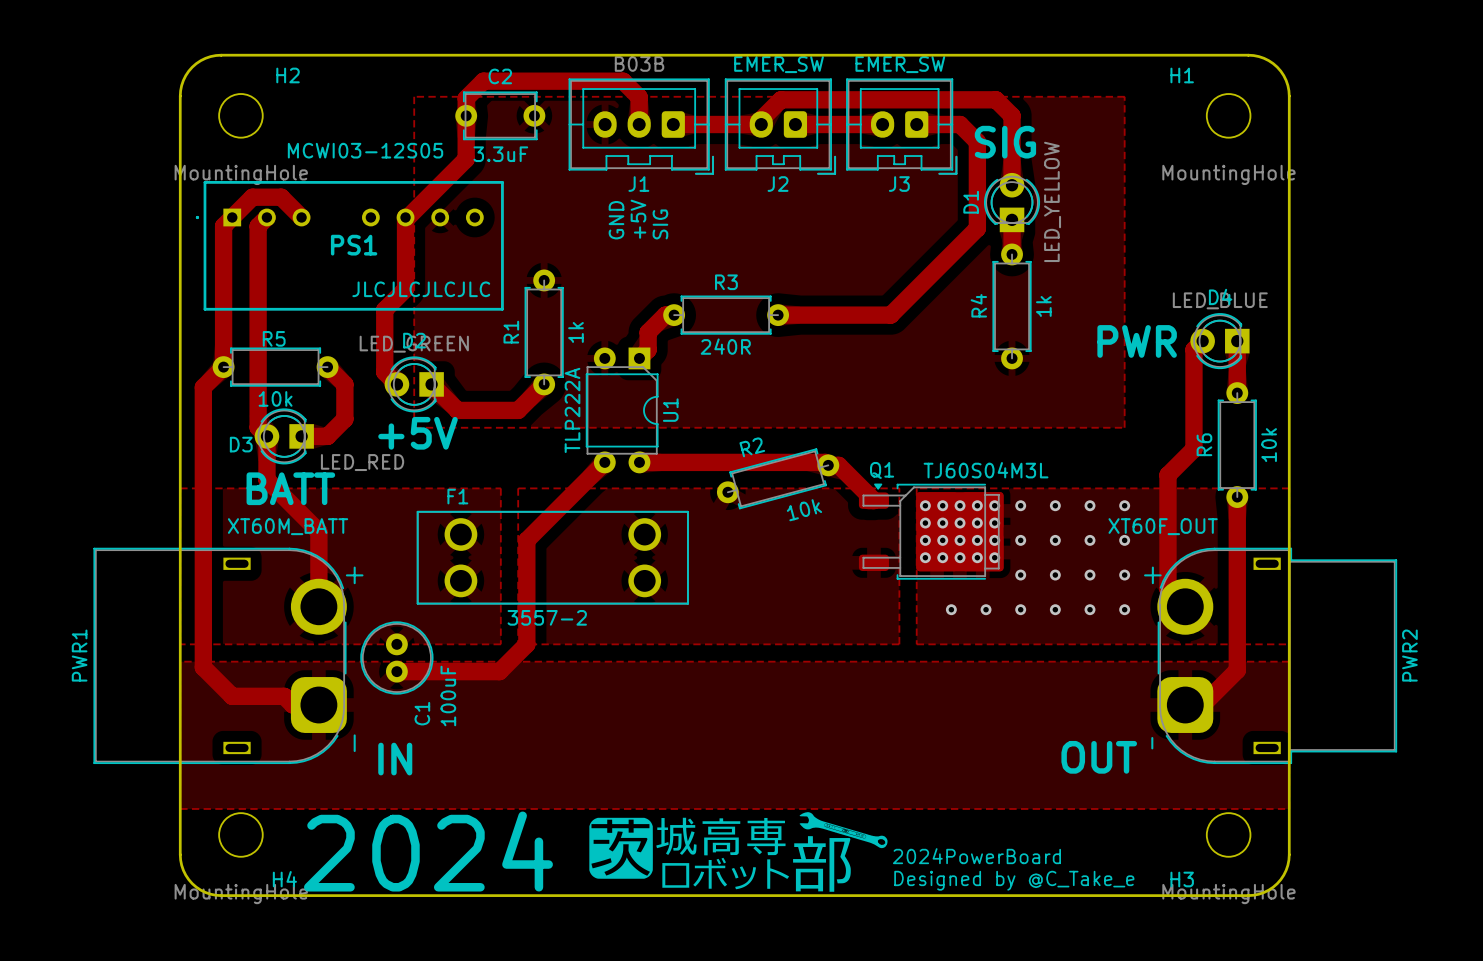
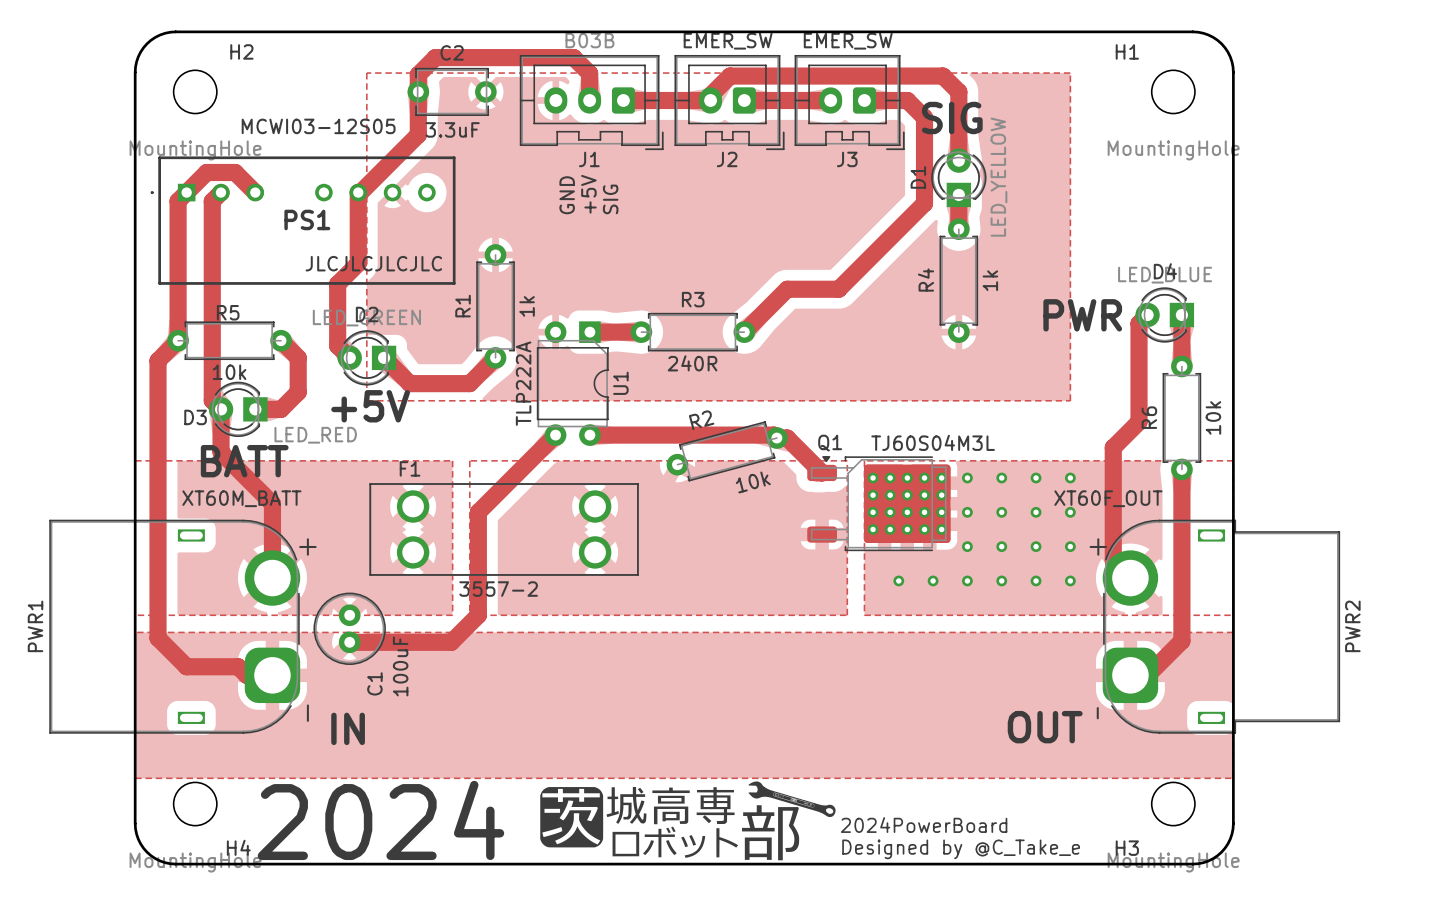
track: (674, 315) (665, 315) (648, 332) (648, 349) (639, 358) -> (641, 332) (589, 332)
R3 position: (726, 315) -> (692, 332)
track: (778, 315) (838, 315) -> (744, 332) (787, 289)

